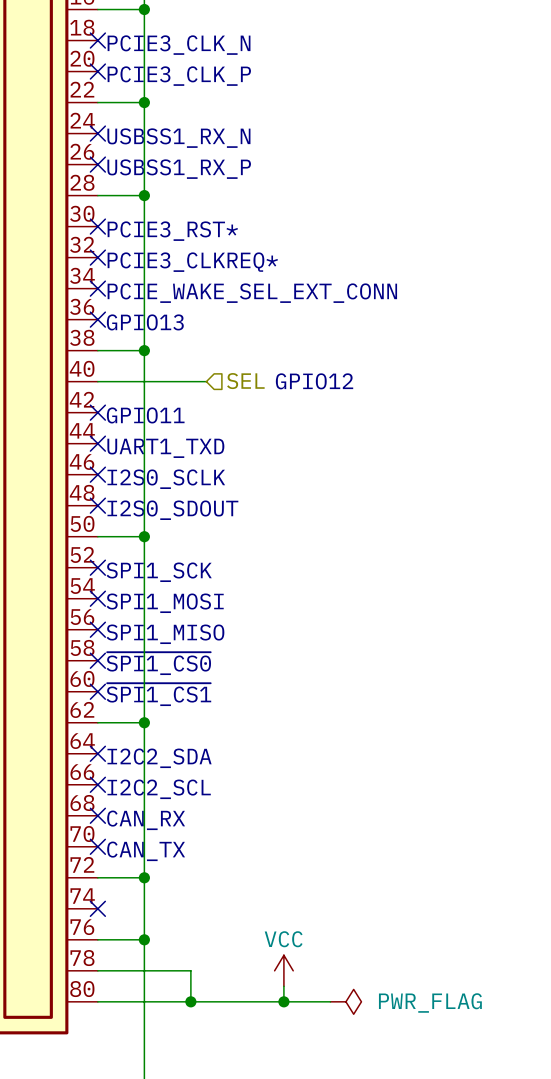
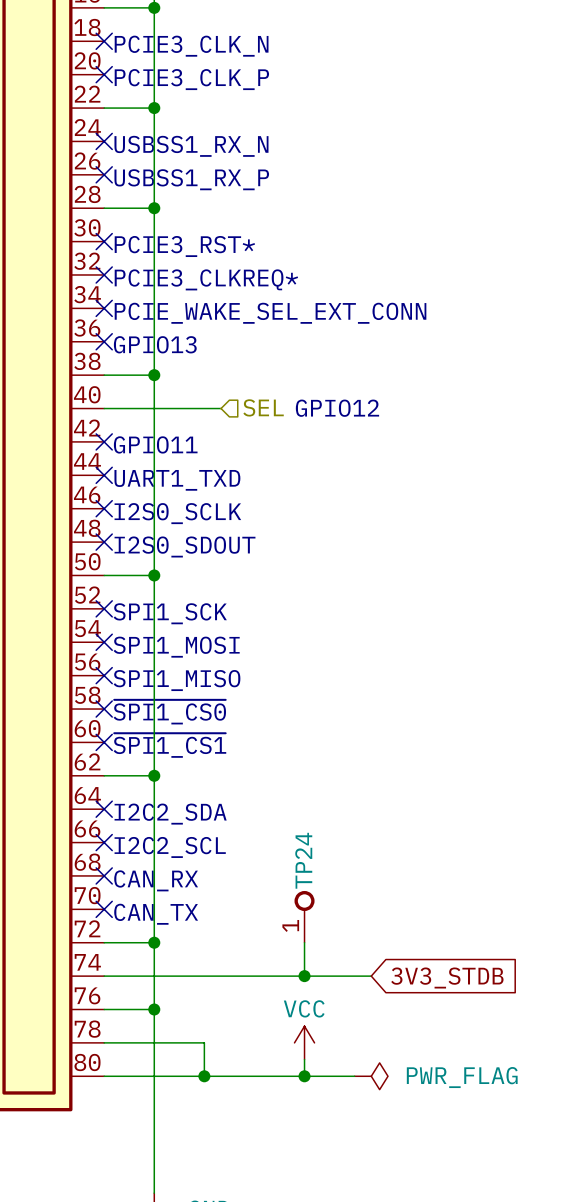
TP24: none -> (304, 916)
wire: none -> (304, 942) (304, 976)
wire: none -> (104, 976) (371, 976)
no-connect mark: (97, 908) -> none
junction: none -> (304, 976)
global label: none -> 3V3_STDB (447, 977)

